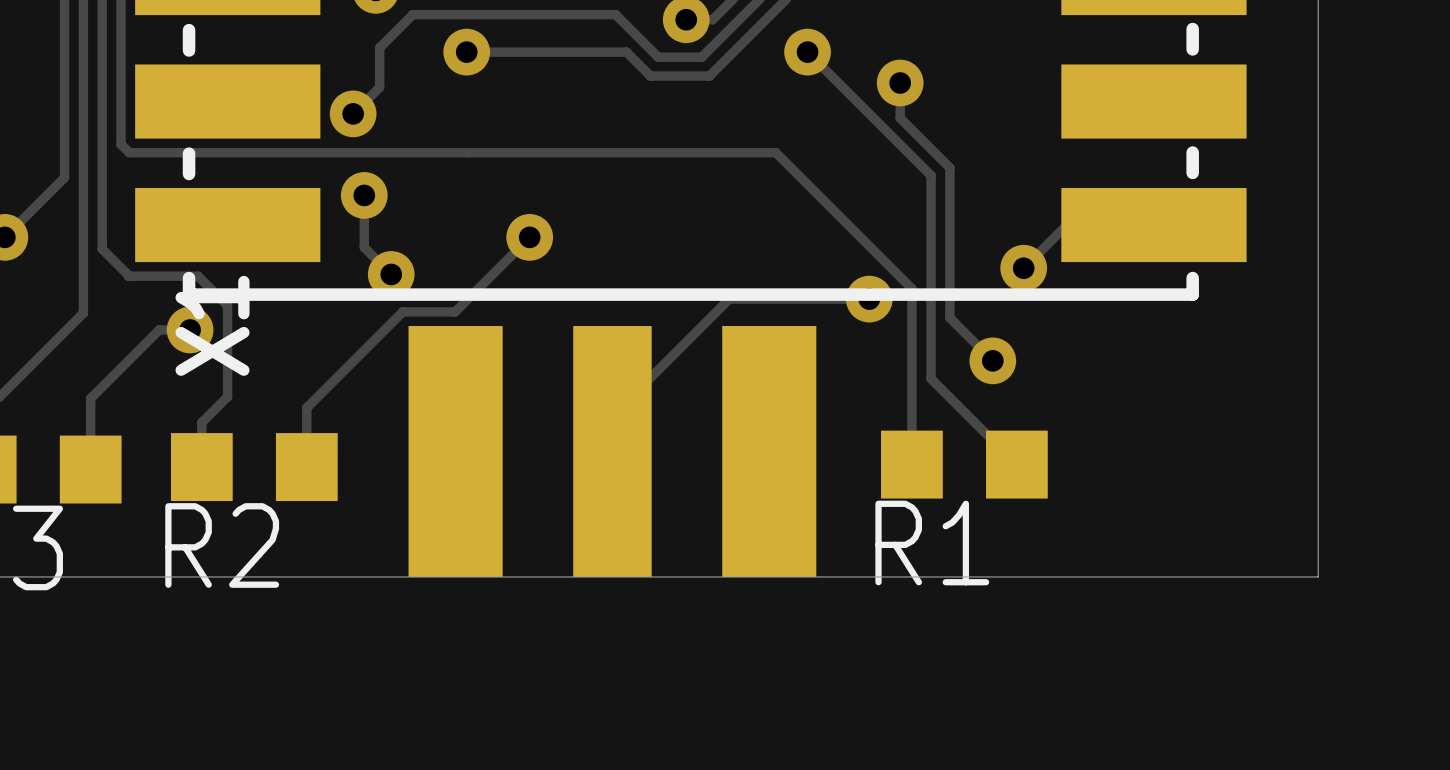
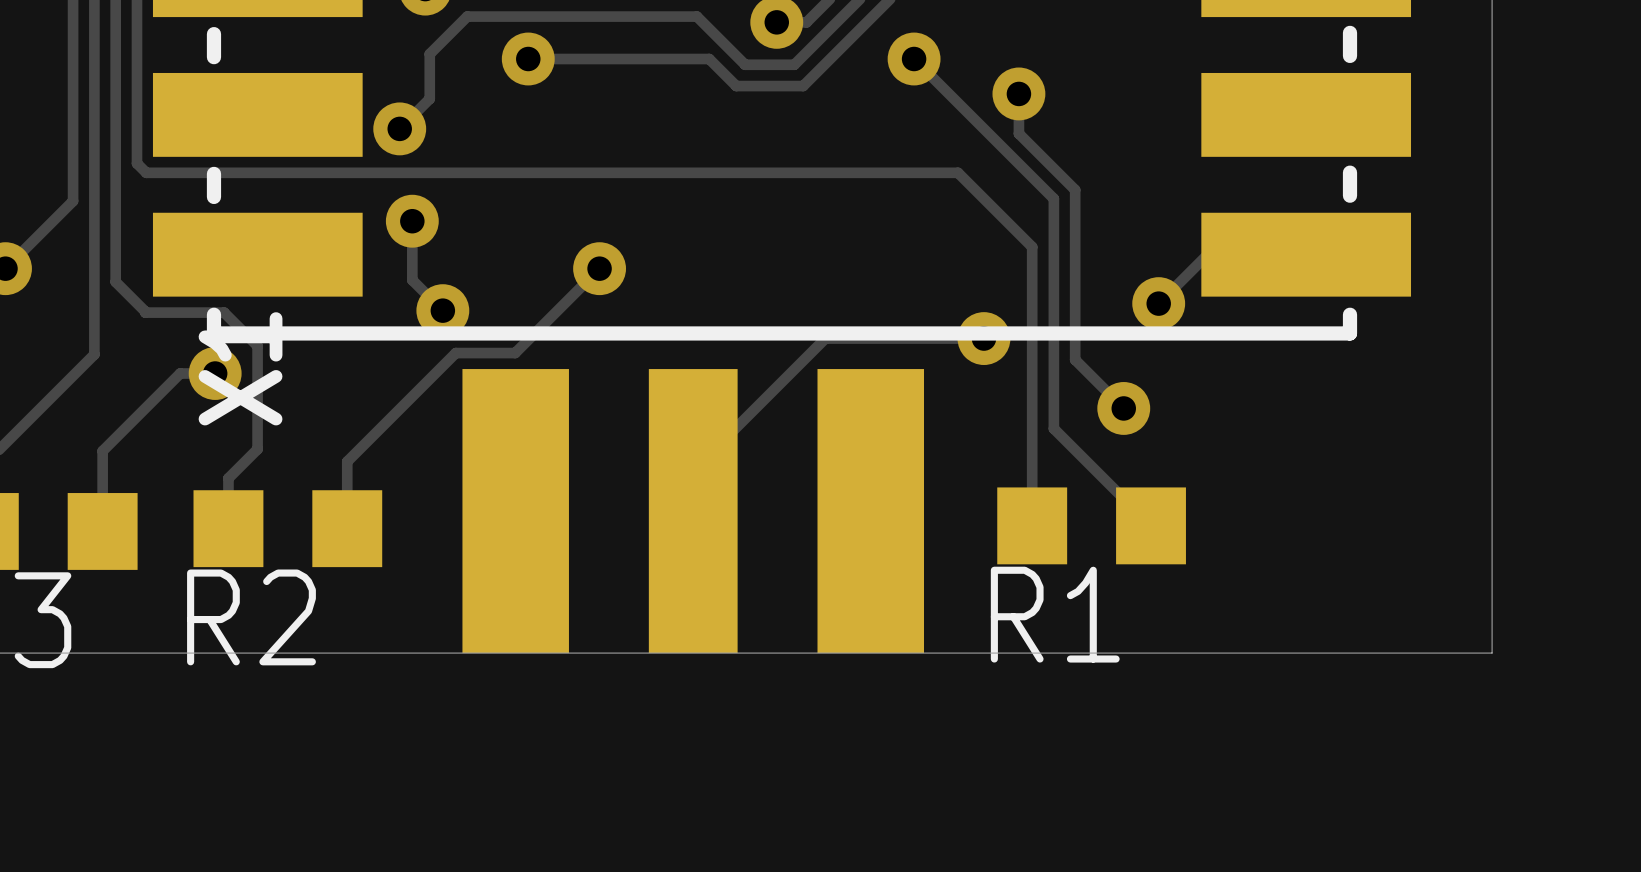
track: (775, 152) (911, 288) -> (878, 172) (958, 172) (1032, 247) (1032, 326)

